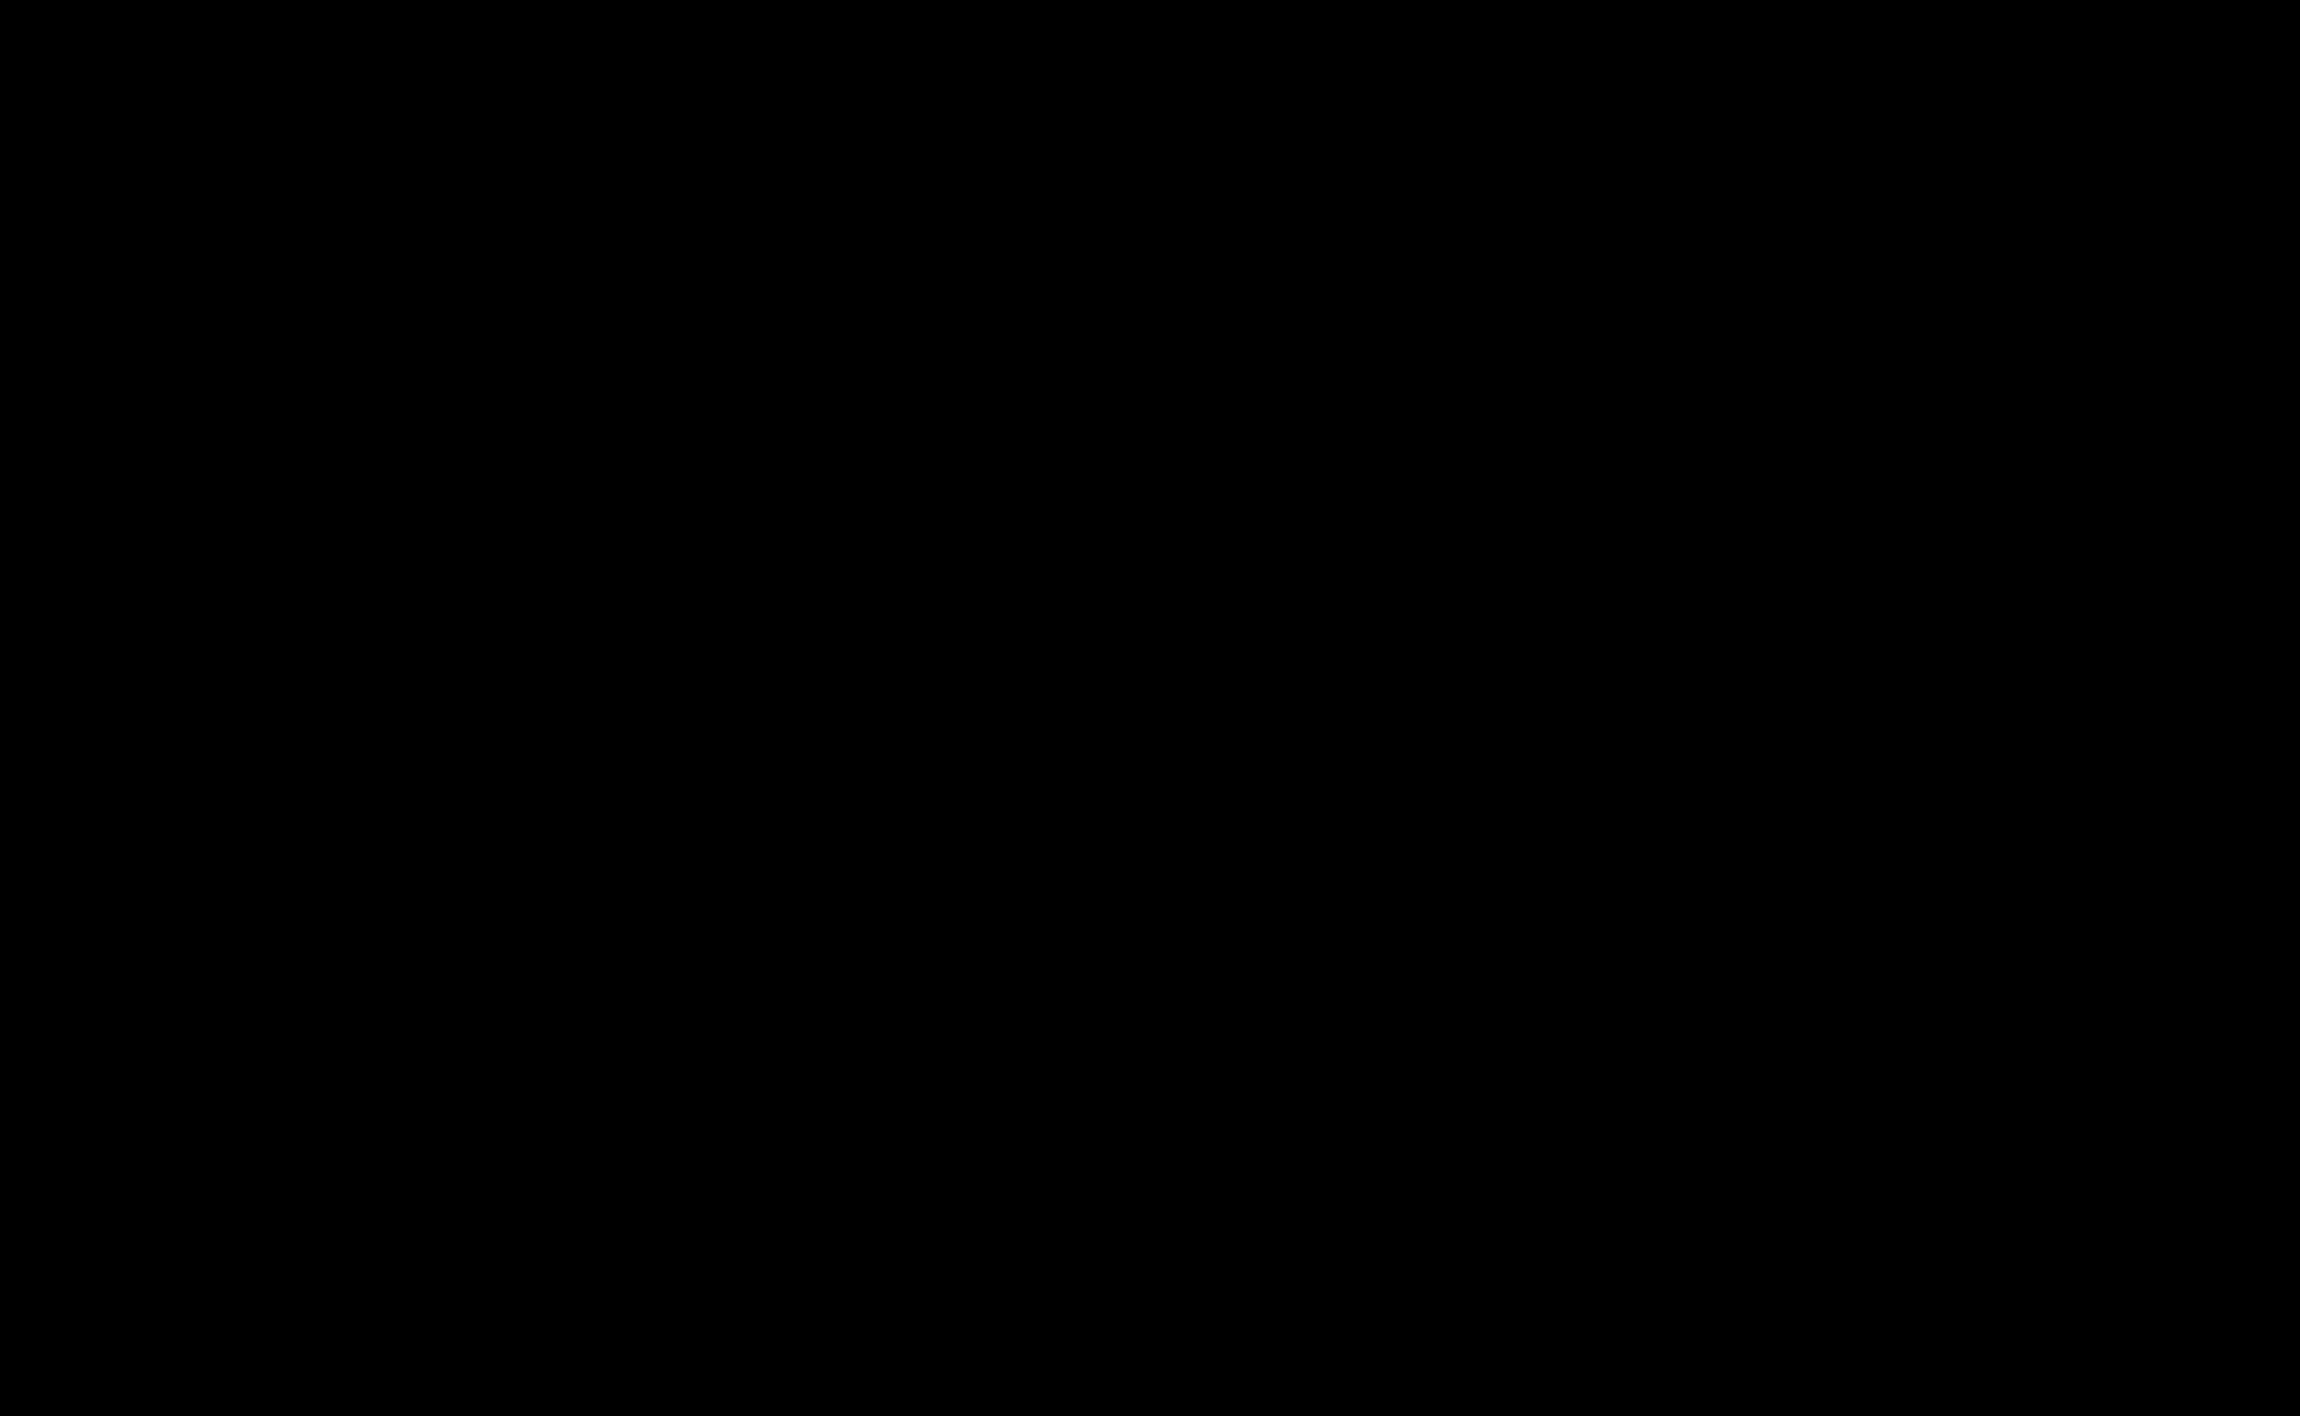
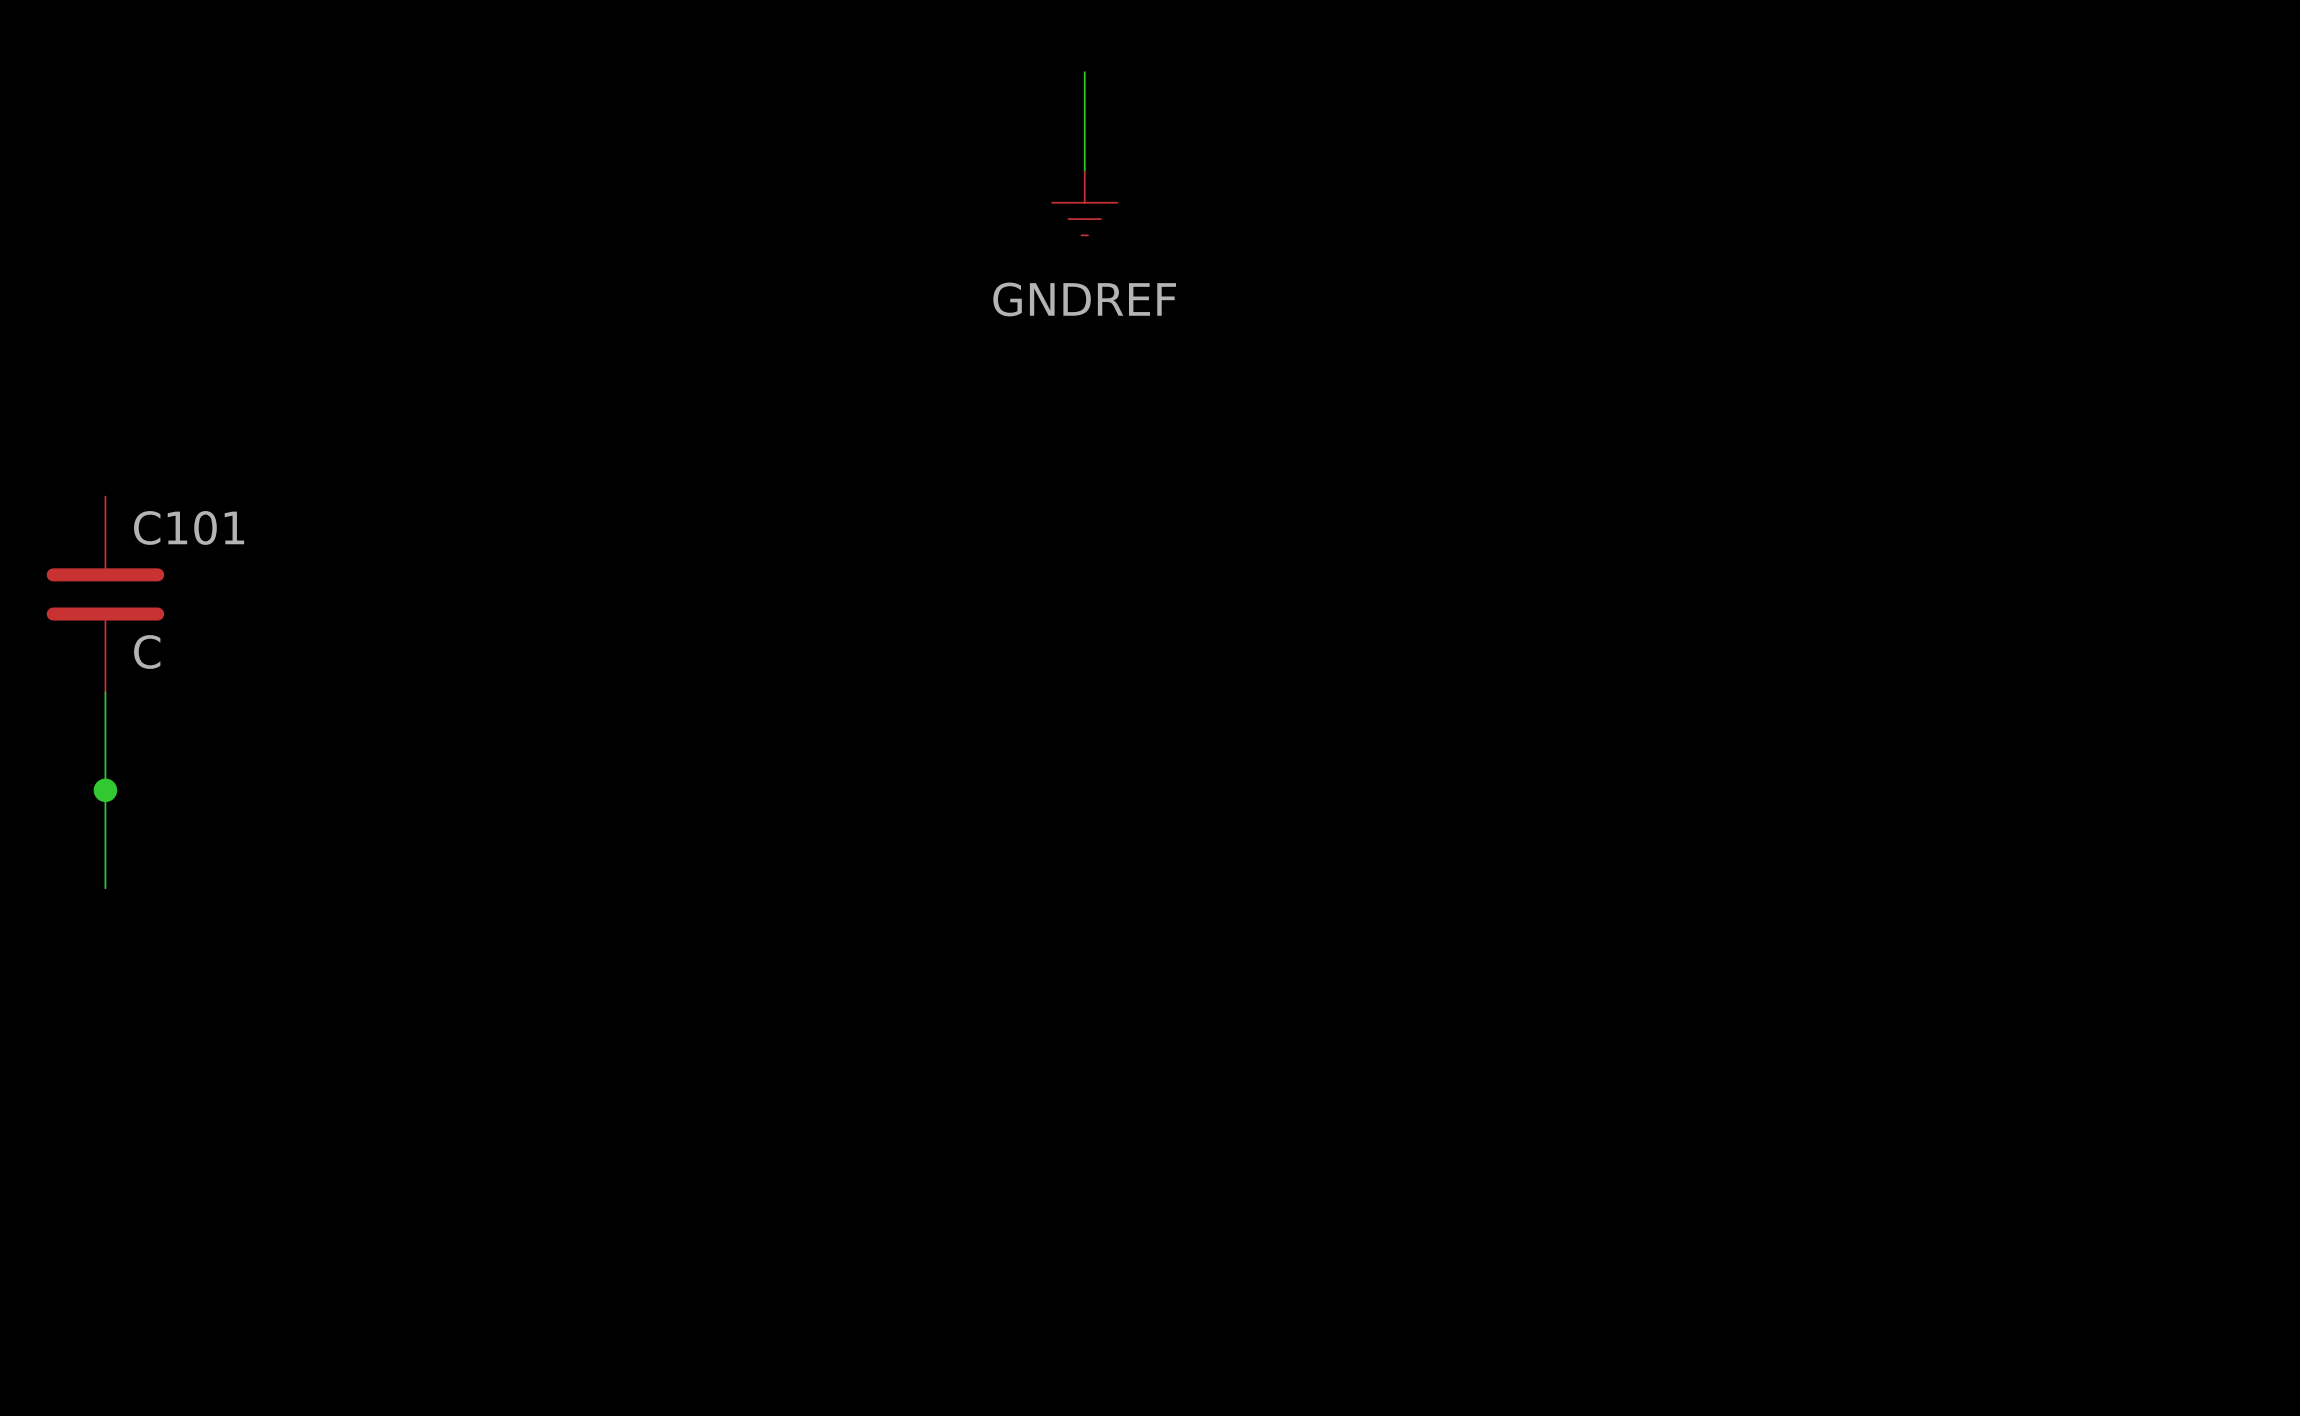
wire: none -> (1084, 72) (1084, 170)
power symbol: none -> GNDREF (1084, 202)
C101: none -> C (105, 594)
wire: none -> (105, 692) (105, 888)
junction: none -> (105, 790)

